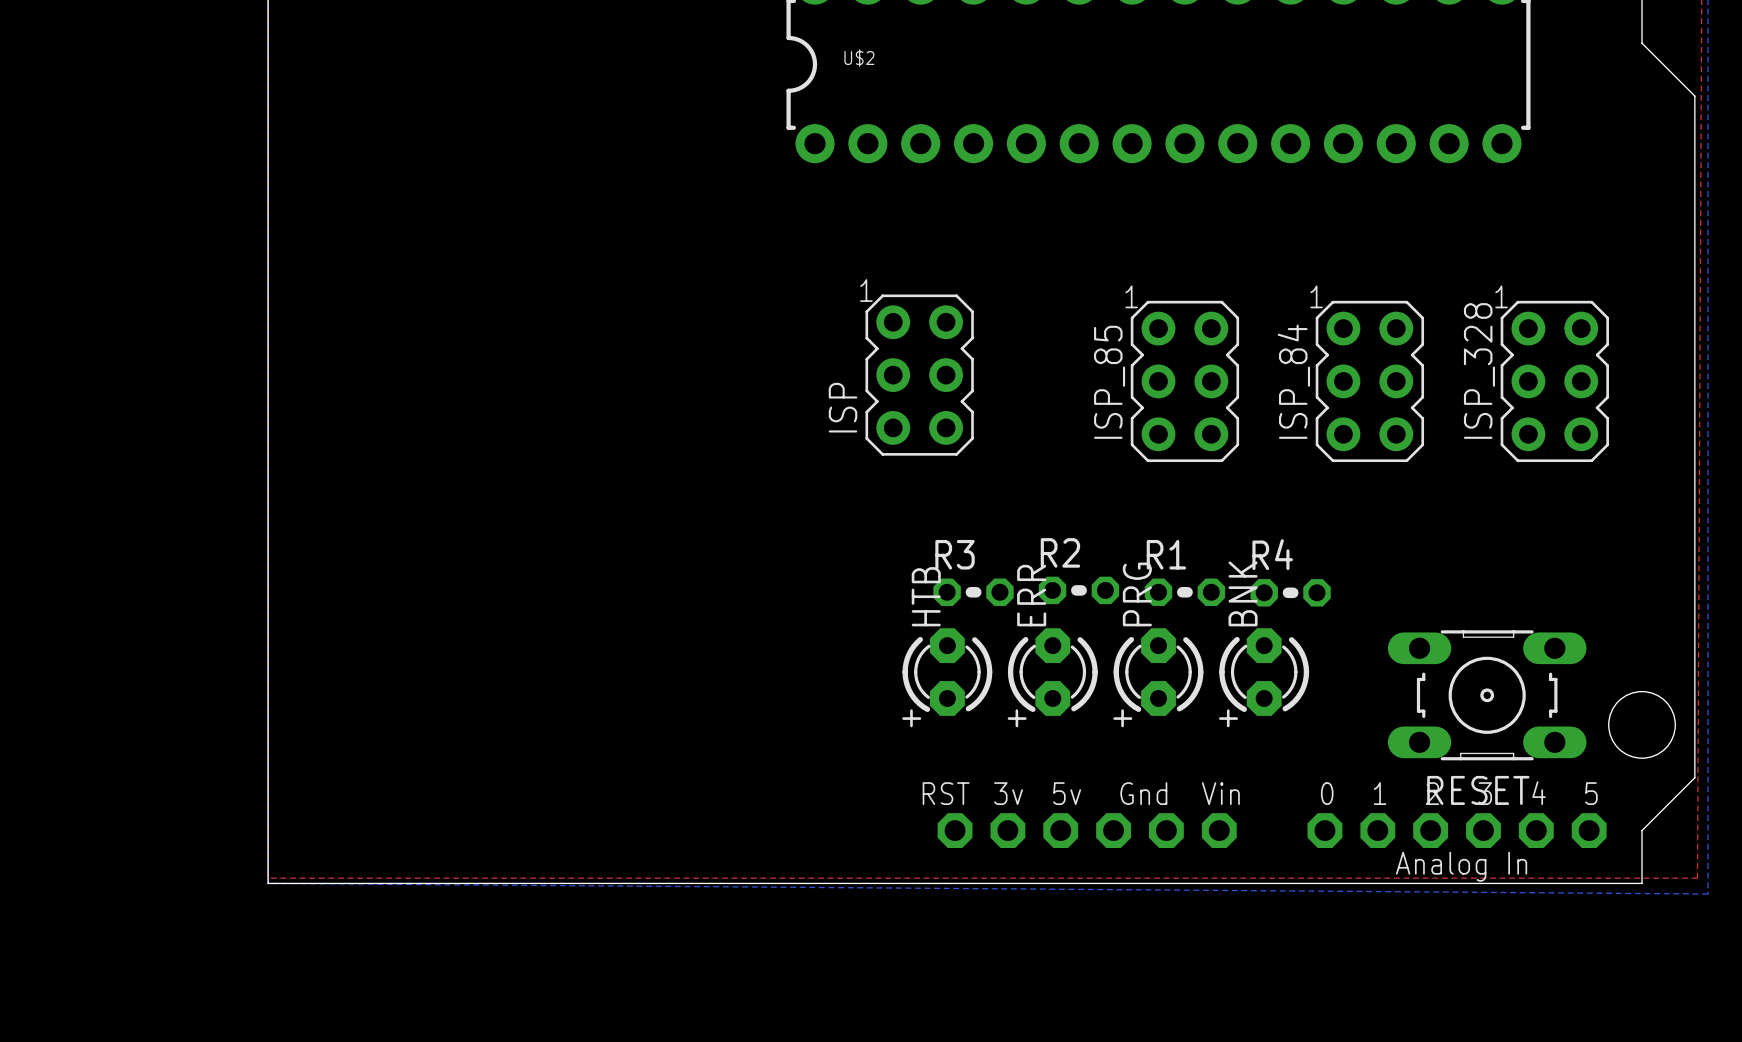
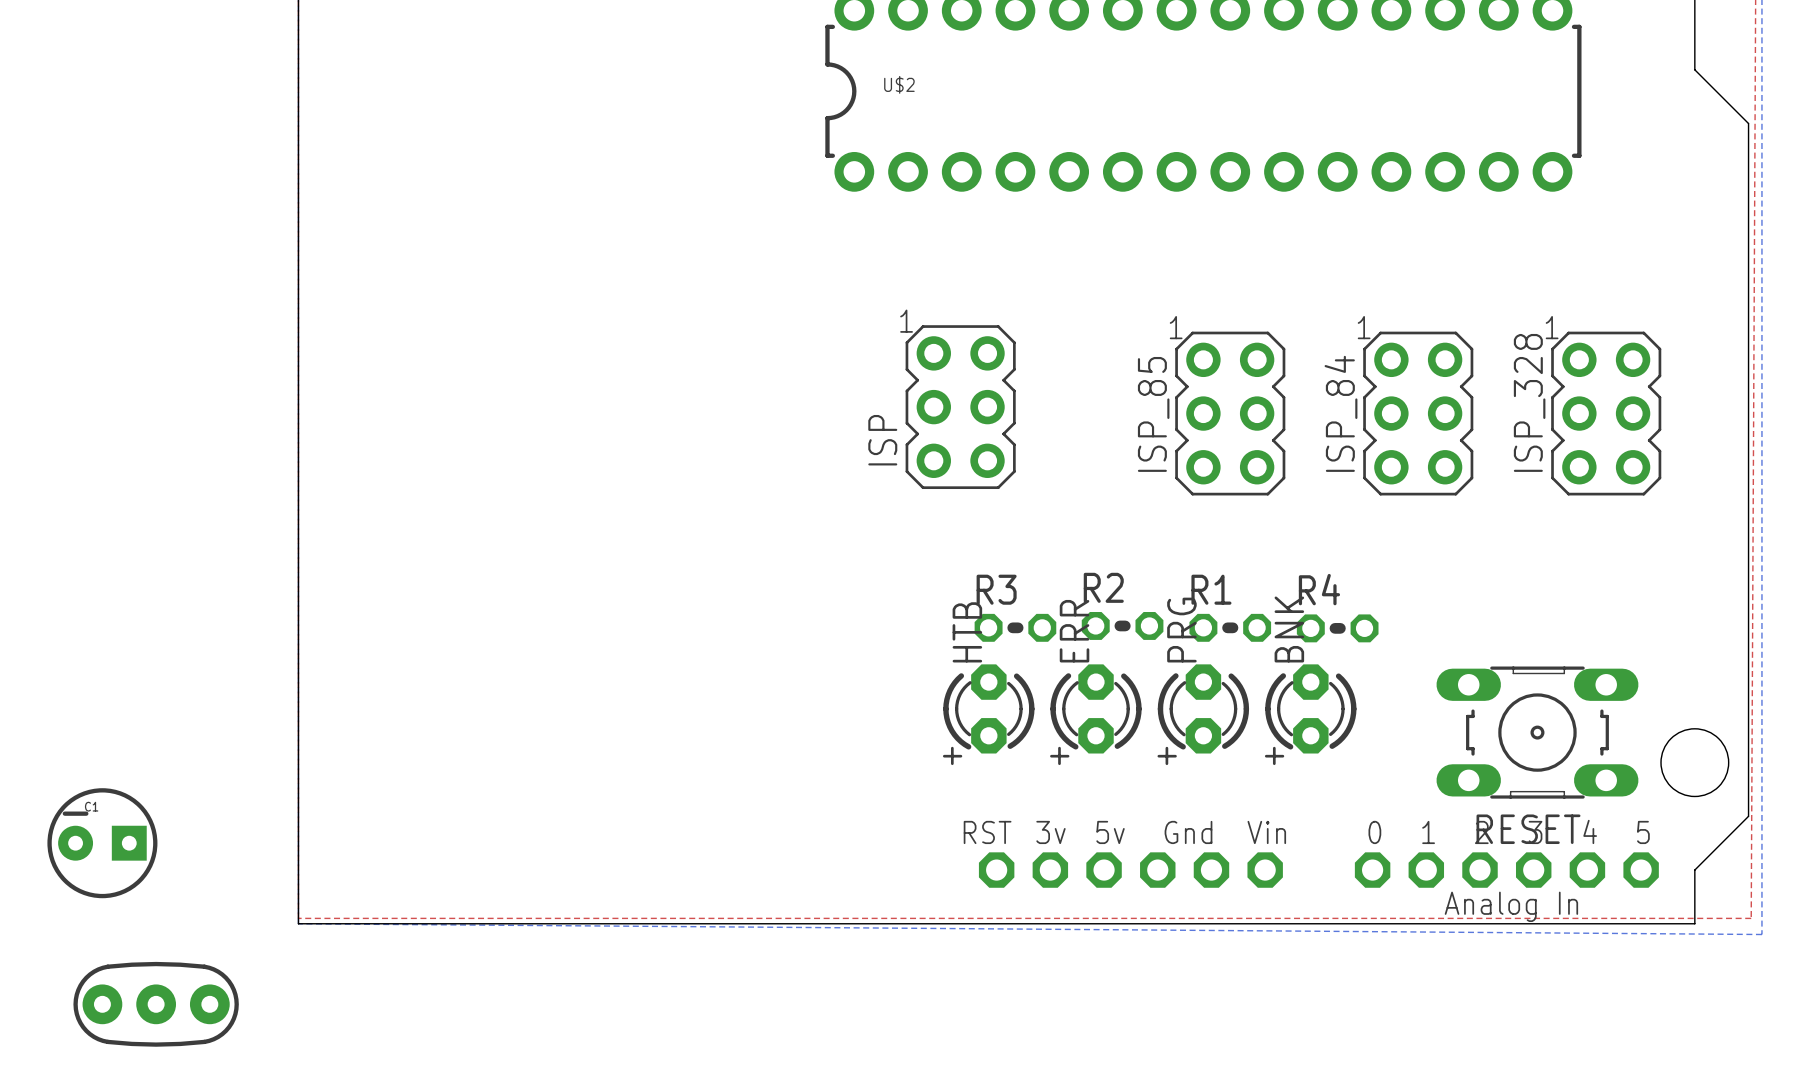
C1: none -> (102, 843)
part: none -> (156, 1004)

